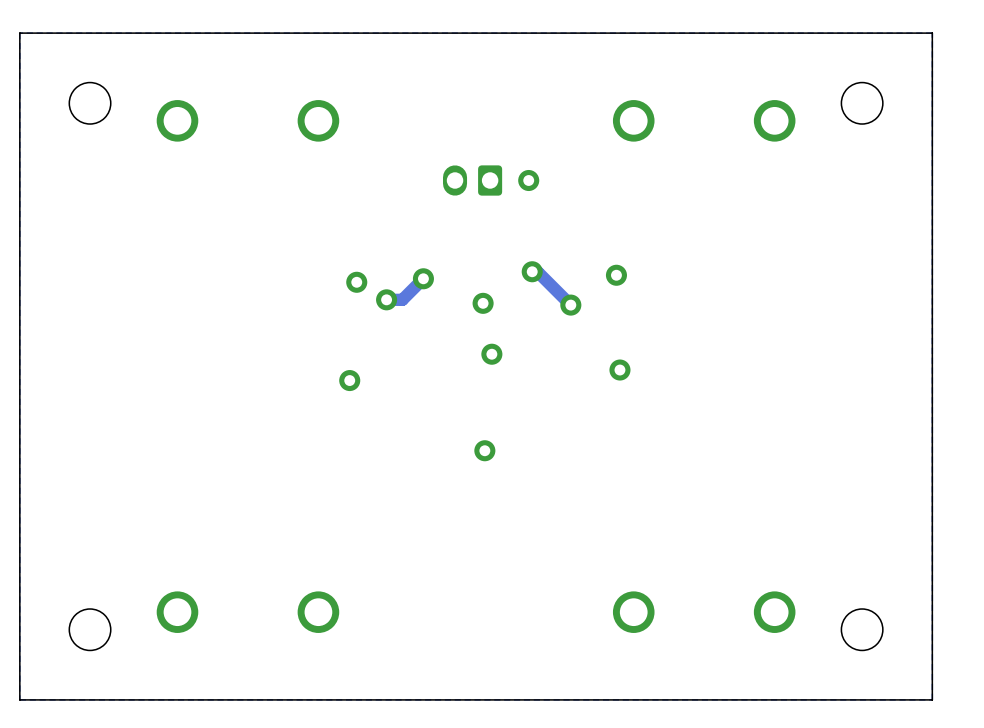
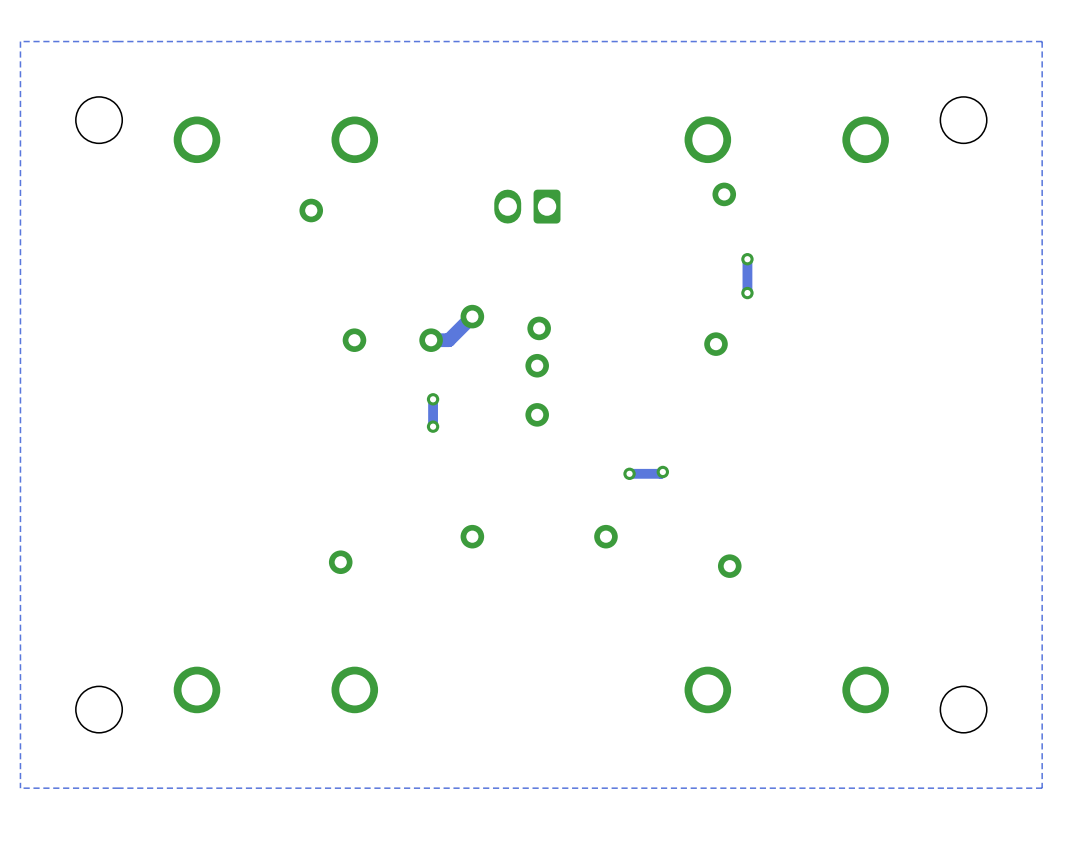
board edge: (932, 33) (932, 699) (19, 699) (19, 33) (932, 33) -> none
via: none -> (724, 194)
via: (528, 180) -> none
via: none -> (311, 210)
track: none -> (747, 259) (747, 293)
via: none -> (747, 259)
via: none -> (747, 293)
track: (532, 271) (537, 271) (570, 305) -> none
via: (532, 271) -> none
via: (616, 275) -> none
via position: (356, 282) -> (354, 340)
via: none -> (539, 328)
via: (483, 303) -> none
via: none -> (716, 344)
via: (570, 305) -> none
via: none -> (537, 365)
track: none -> (433, 399) (433, 426)
via: none -> (433, 399)
via position: (491, 354) -> (537, 414)
via: (619, 370) -> none
via: none -> (433, 426)
via: (349, 380) -> none
track: none -> (662, 471) (660, 473) (629, 473)
via: none -> (662, 471)
via: none -> (629, 473)
via: (484, 450) -> none
via: none -> (472, 536)
via: none -> (605, 536)
via: none -> (340, 562)
via: none -> (729, 566)

